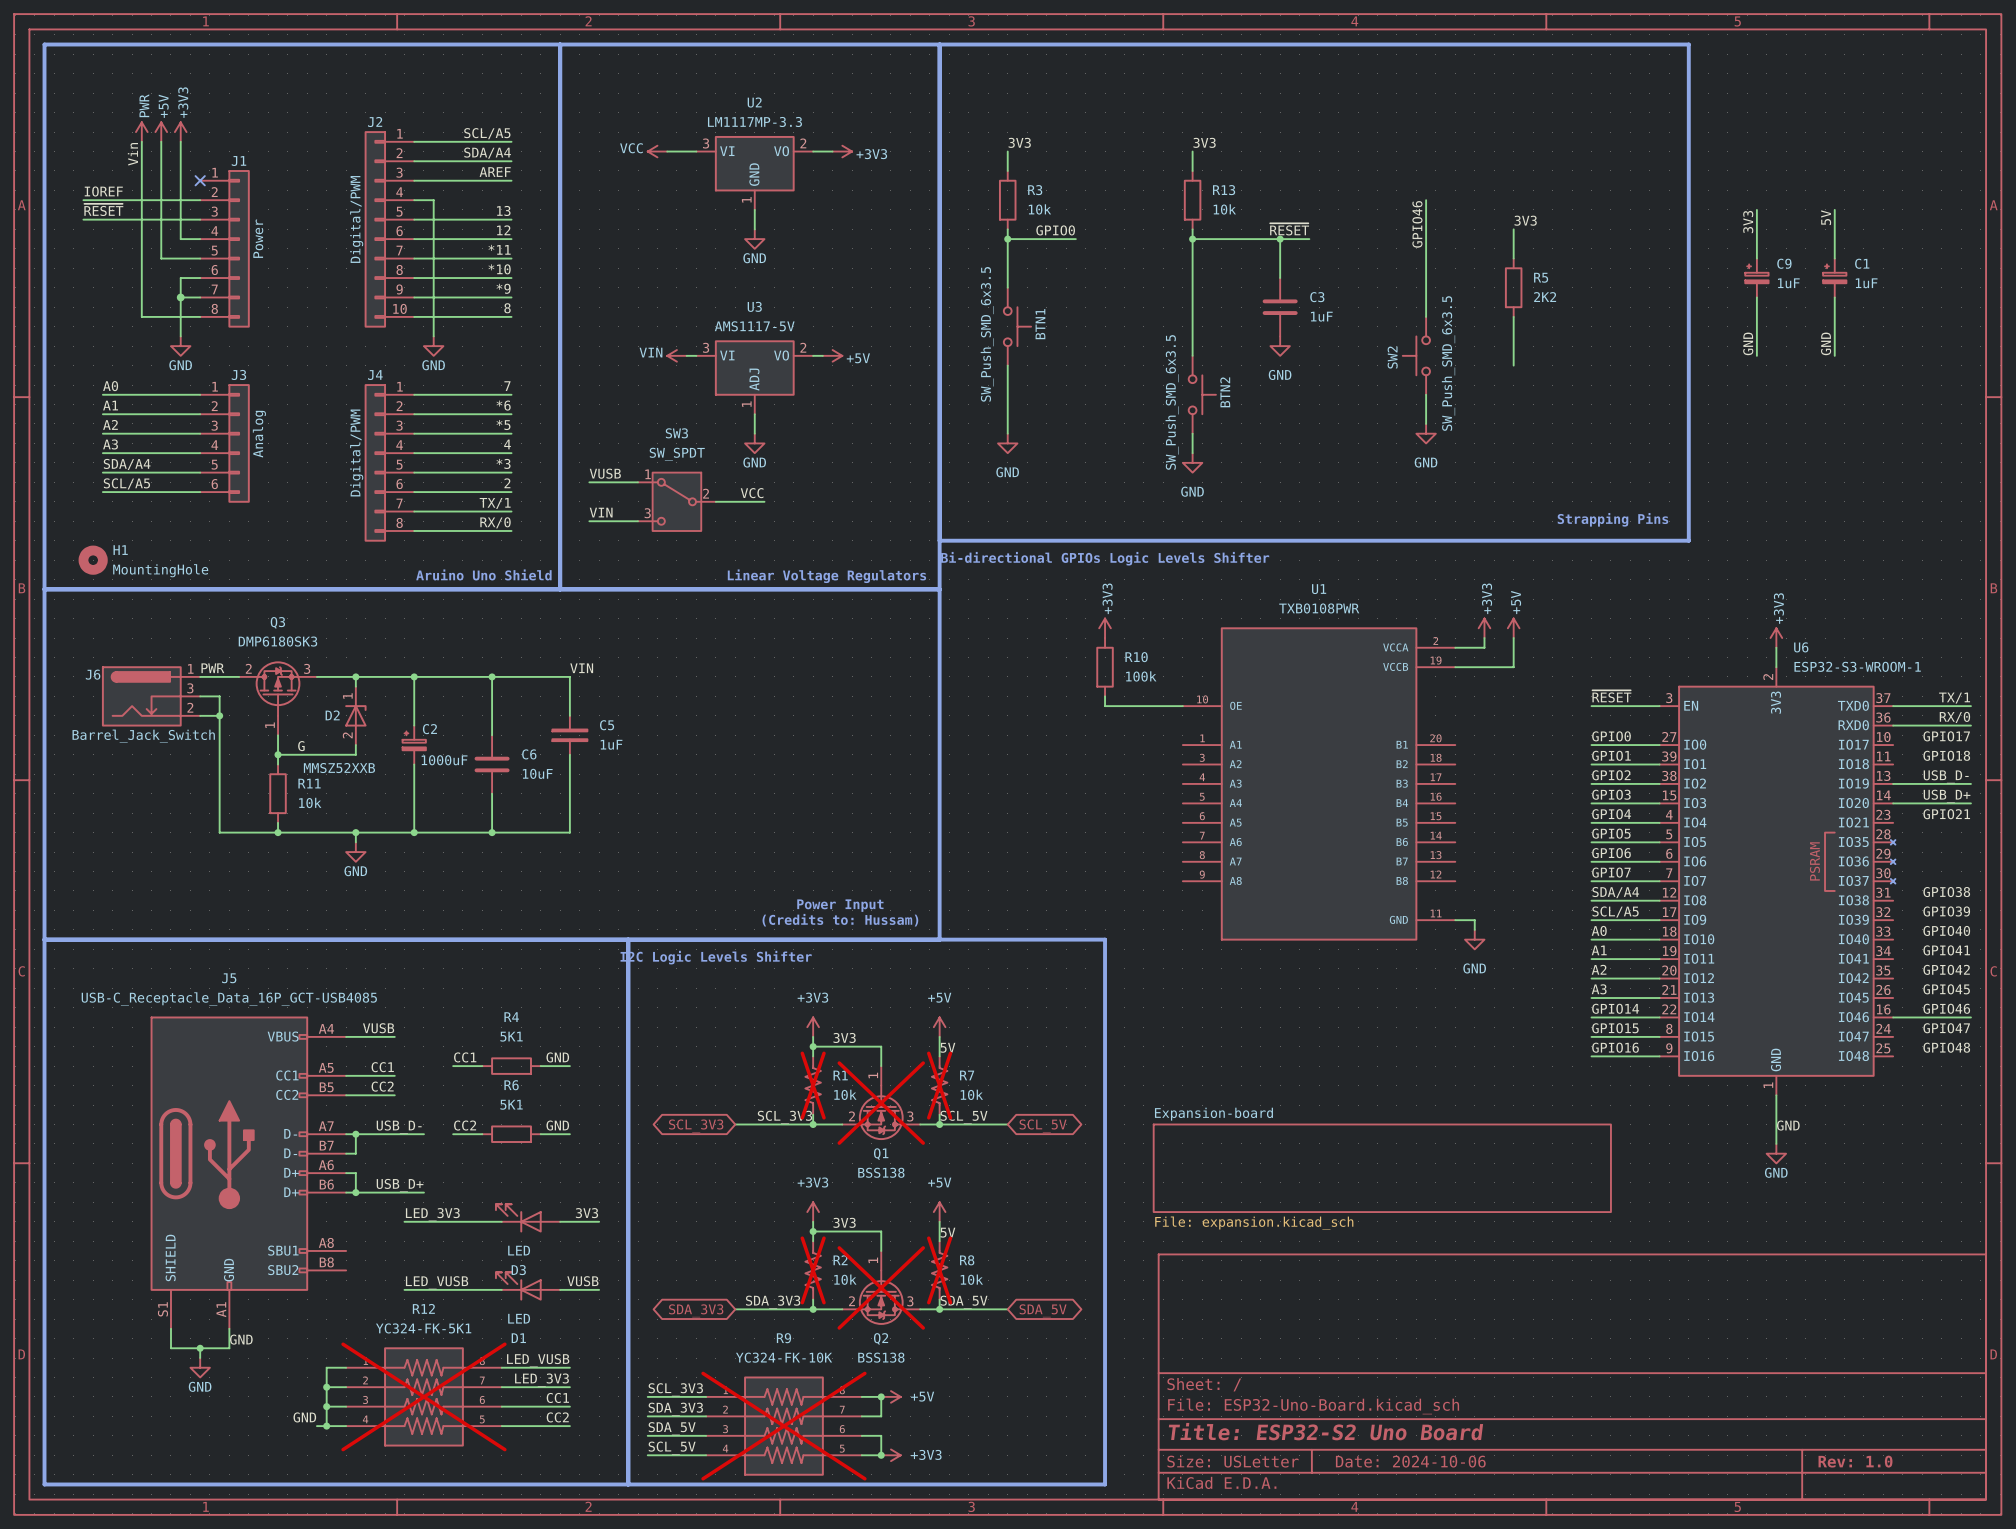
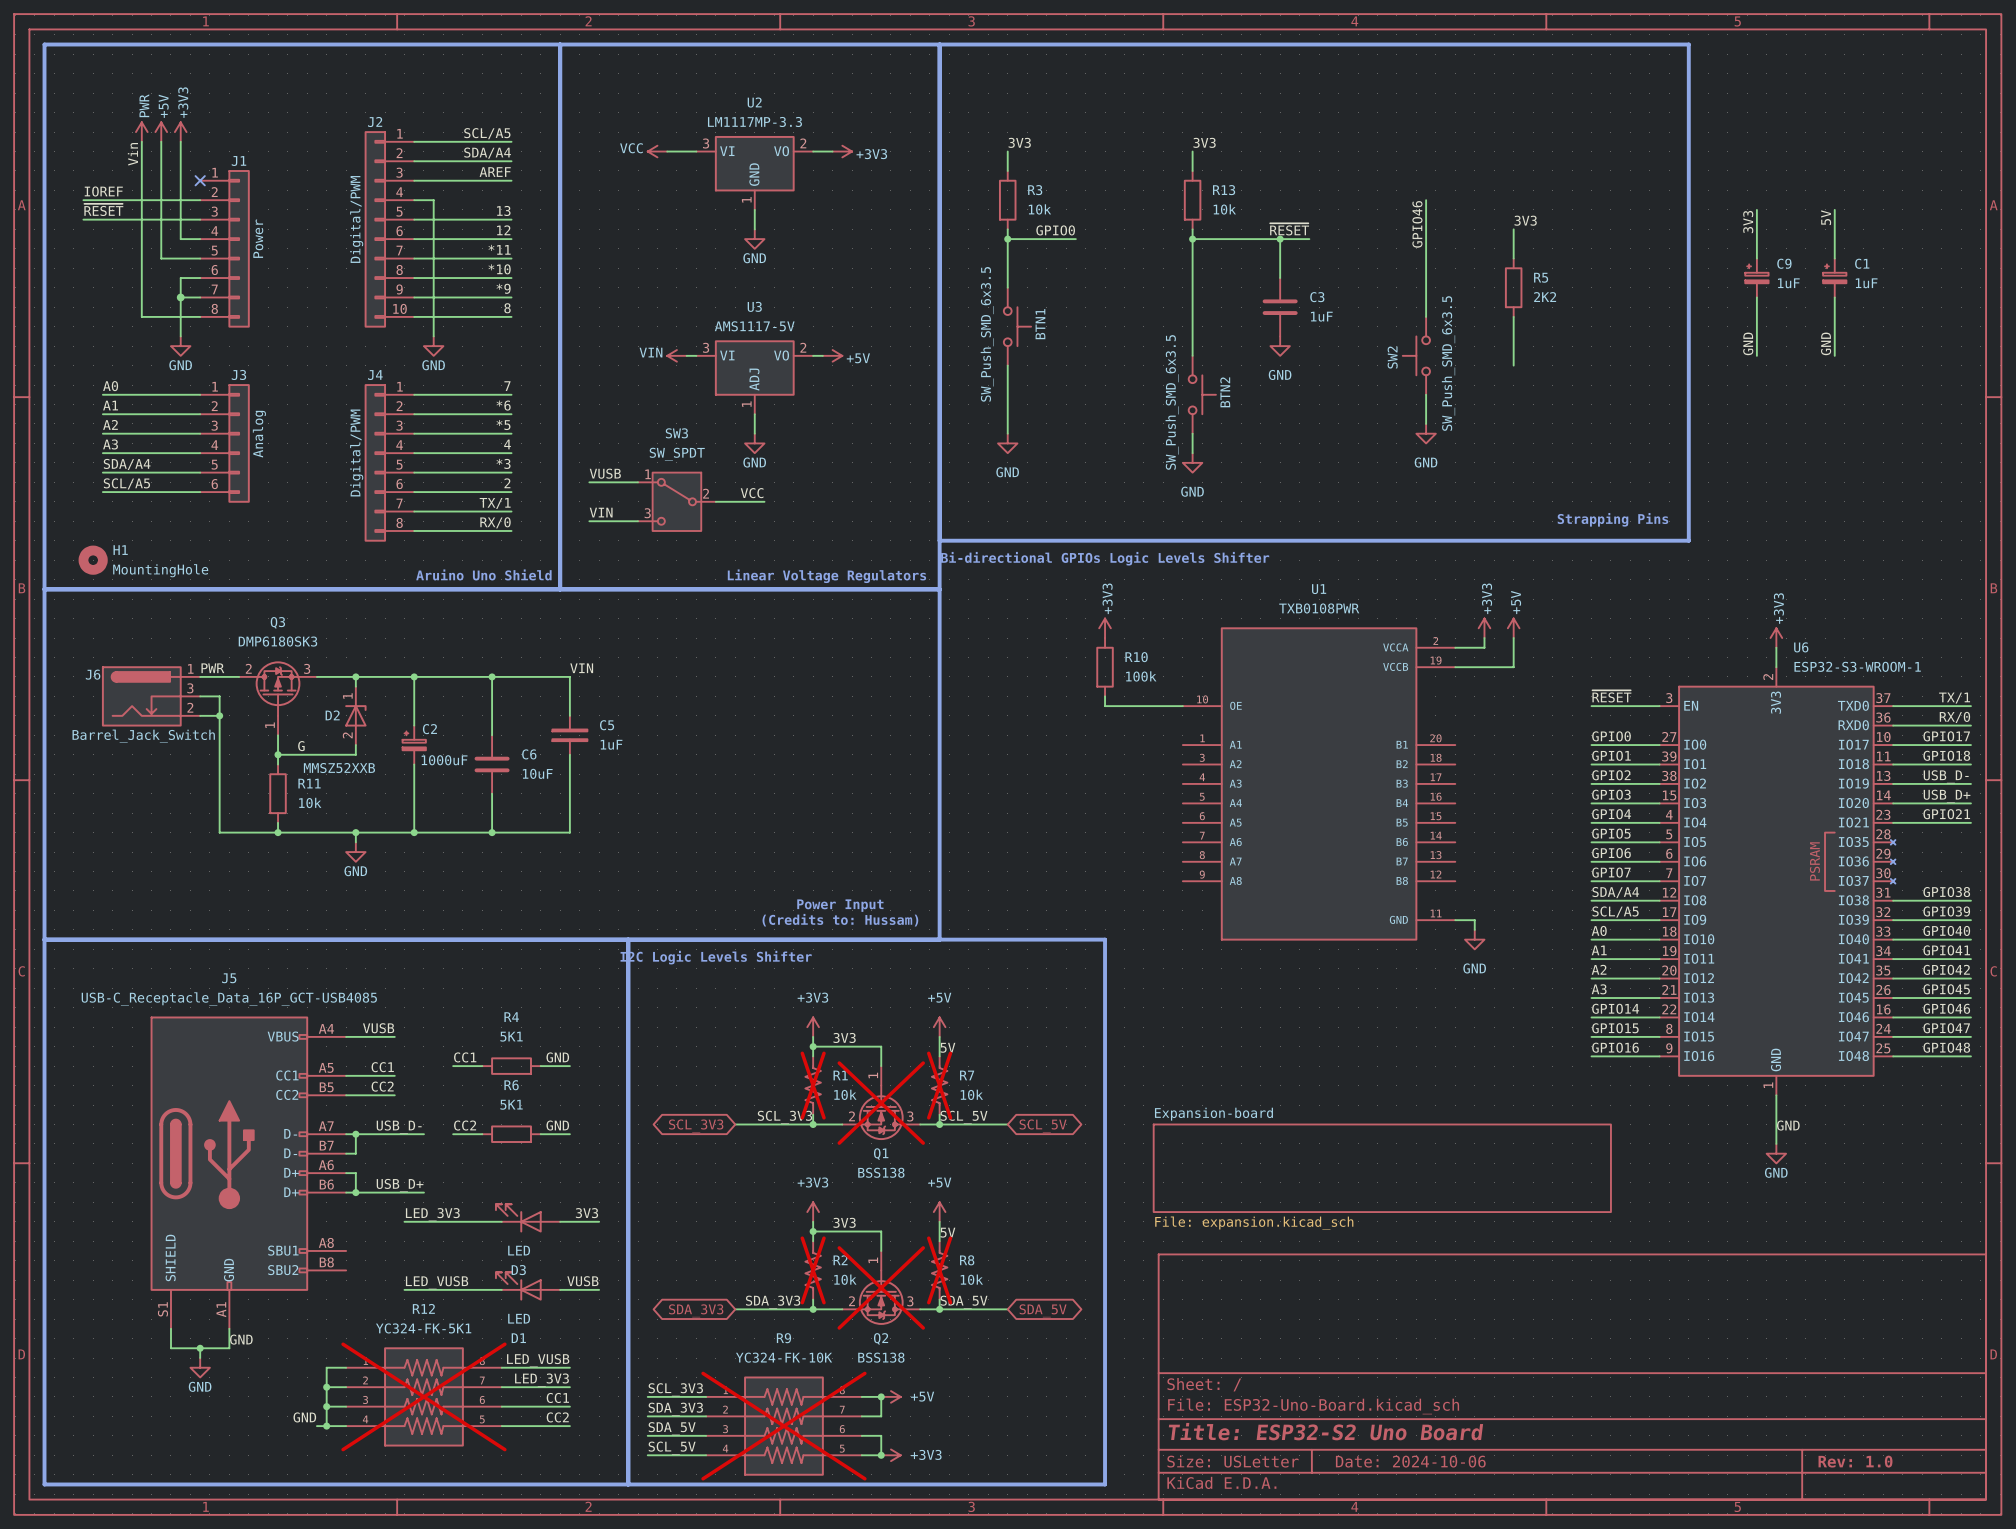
wire: none -> (1893, 745) (1970, 745)
wire: none -> (1893, 764) (1970, 764)
wire: none -> (1893, 822) (1970, 822)
wire: none -> (1893, 900) (1970, 900)
wire: none -> (1893, 920) (1970, 920)
wire: none -> (1893, 939) (1970, 939)
wire: none -> (1893, 959) (1970, 959)
wire: none -> (1893, 978) (1970, 978)
wire: none -> (1893, 998) (1970, 998)
wire: none -> (1893, 1036) (1970, 1036)
wire: none -> (1893, 1056) (1970, 1056)

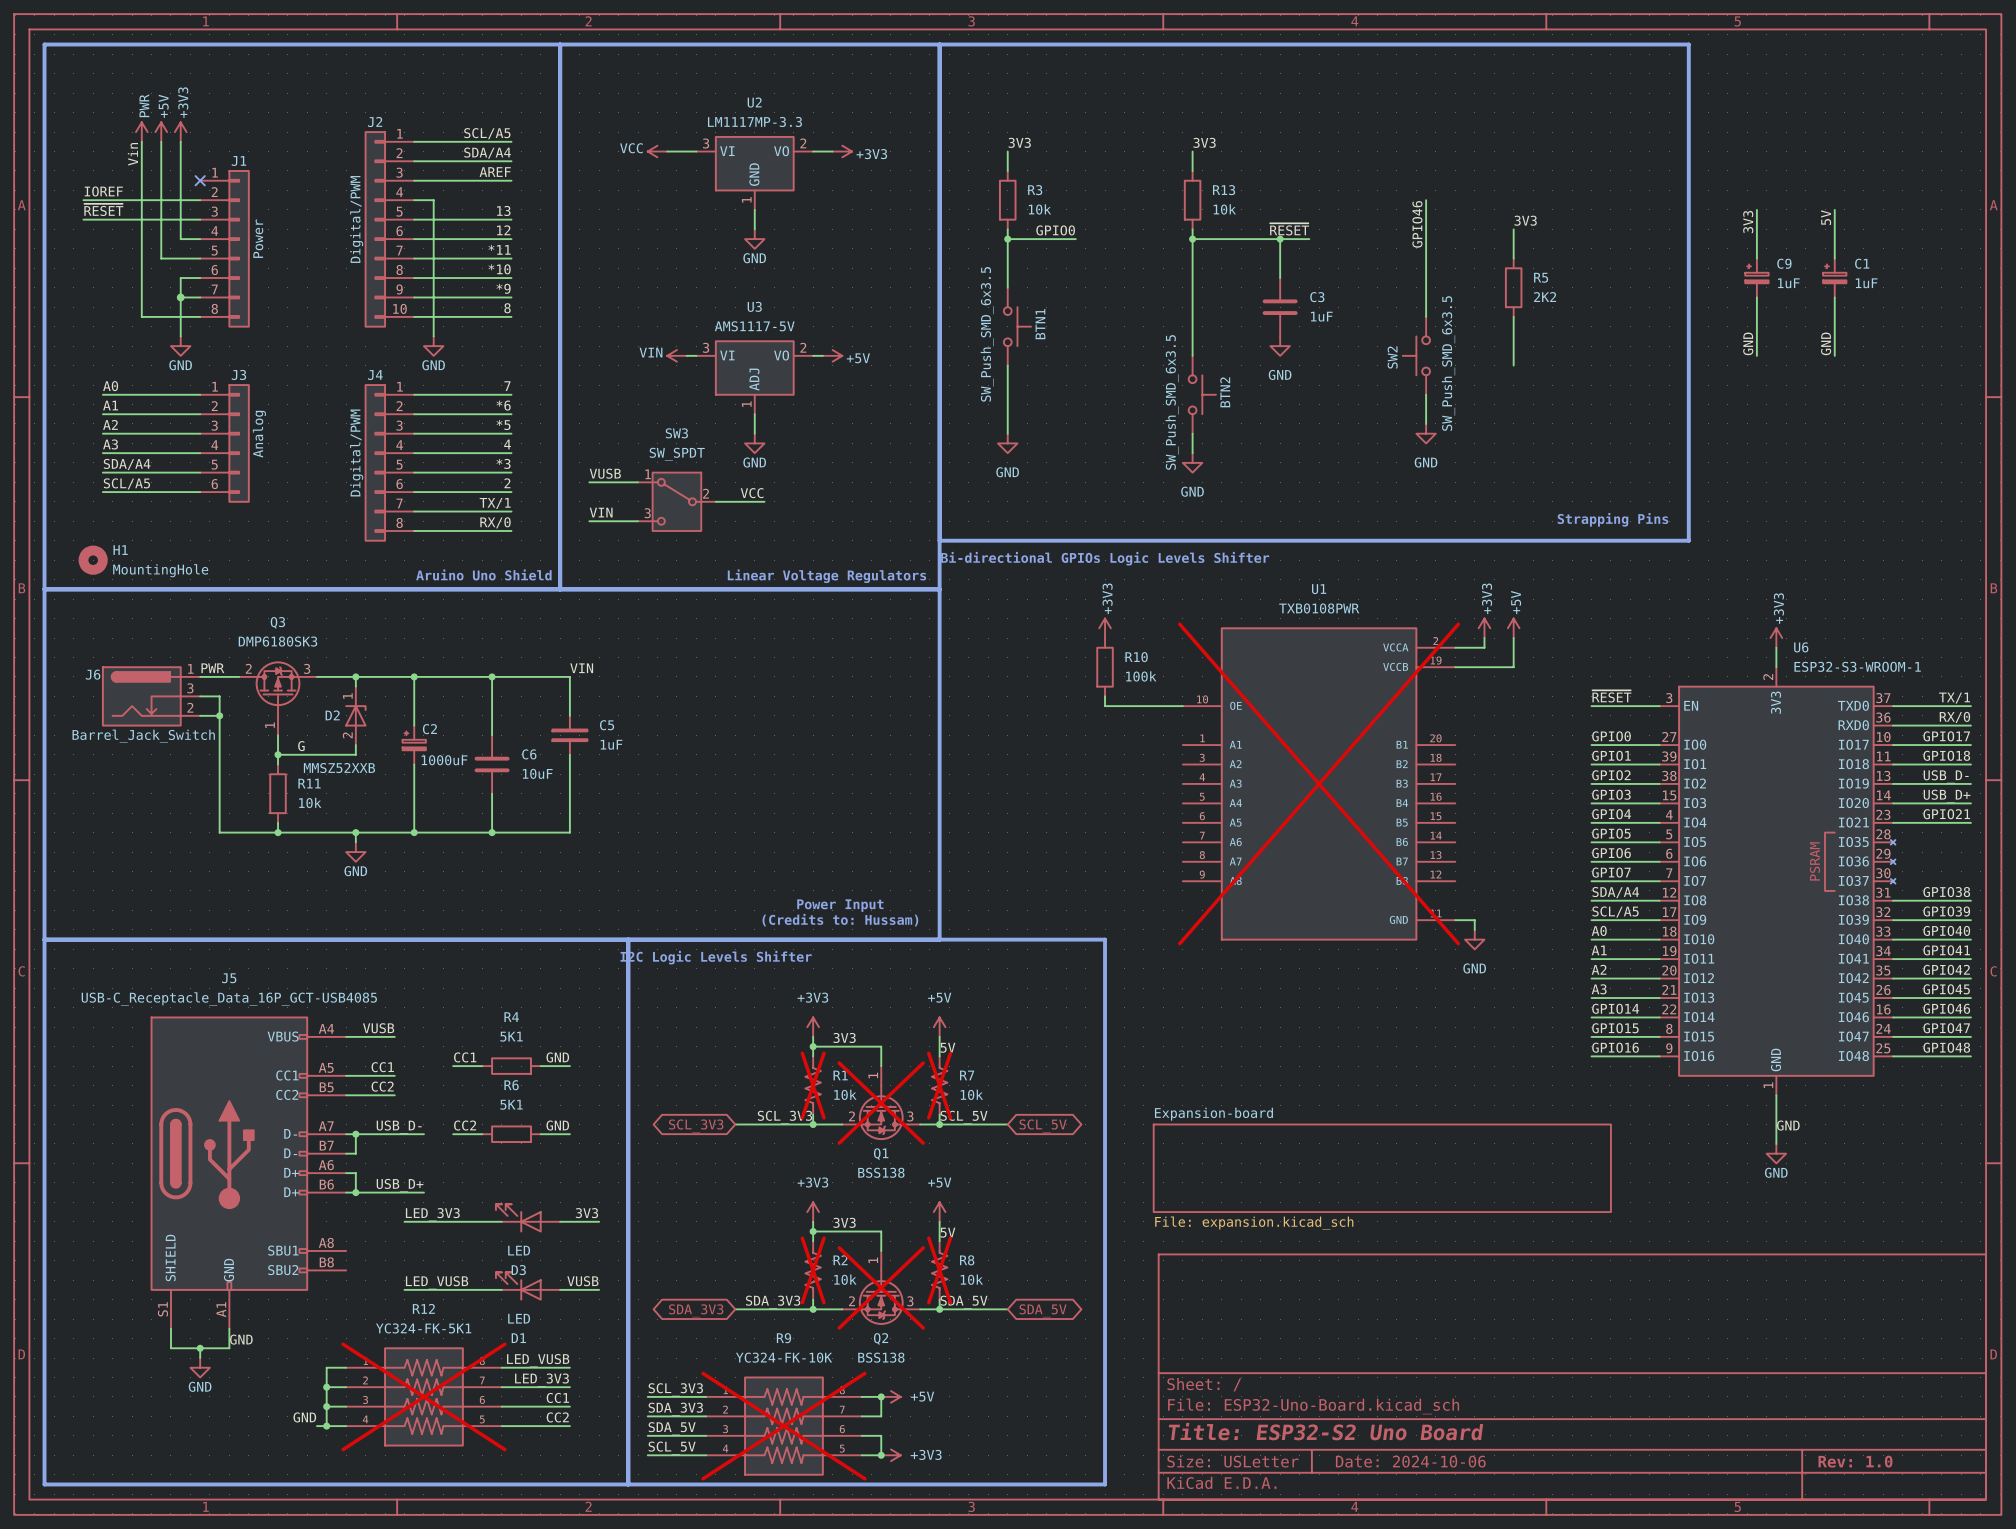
U1 do-not-place cross: none -> (1319, 783)

